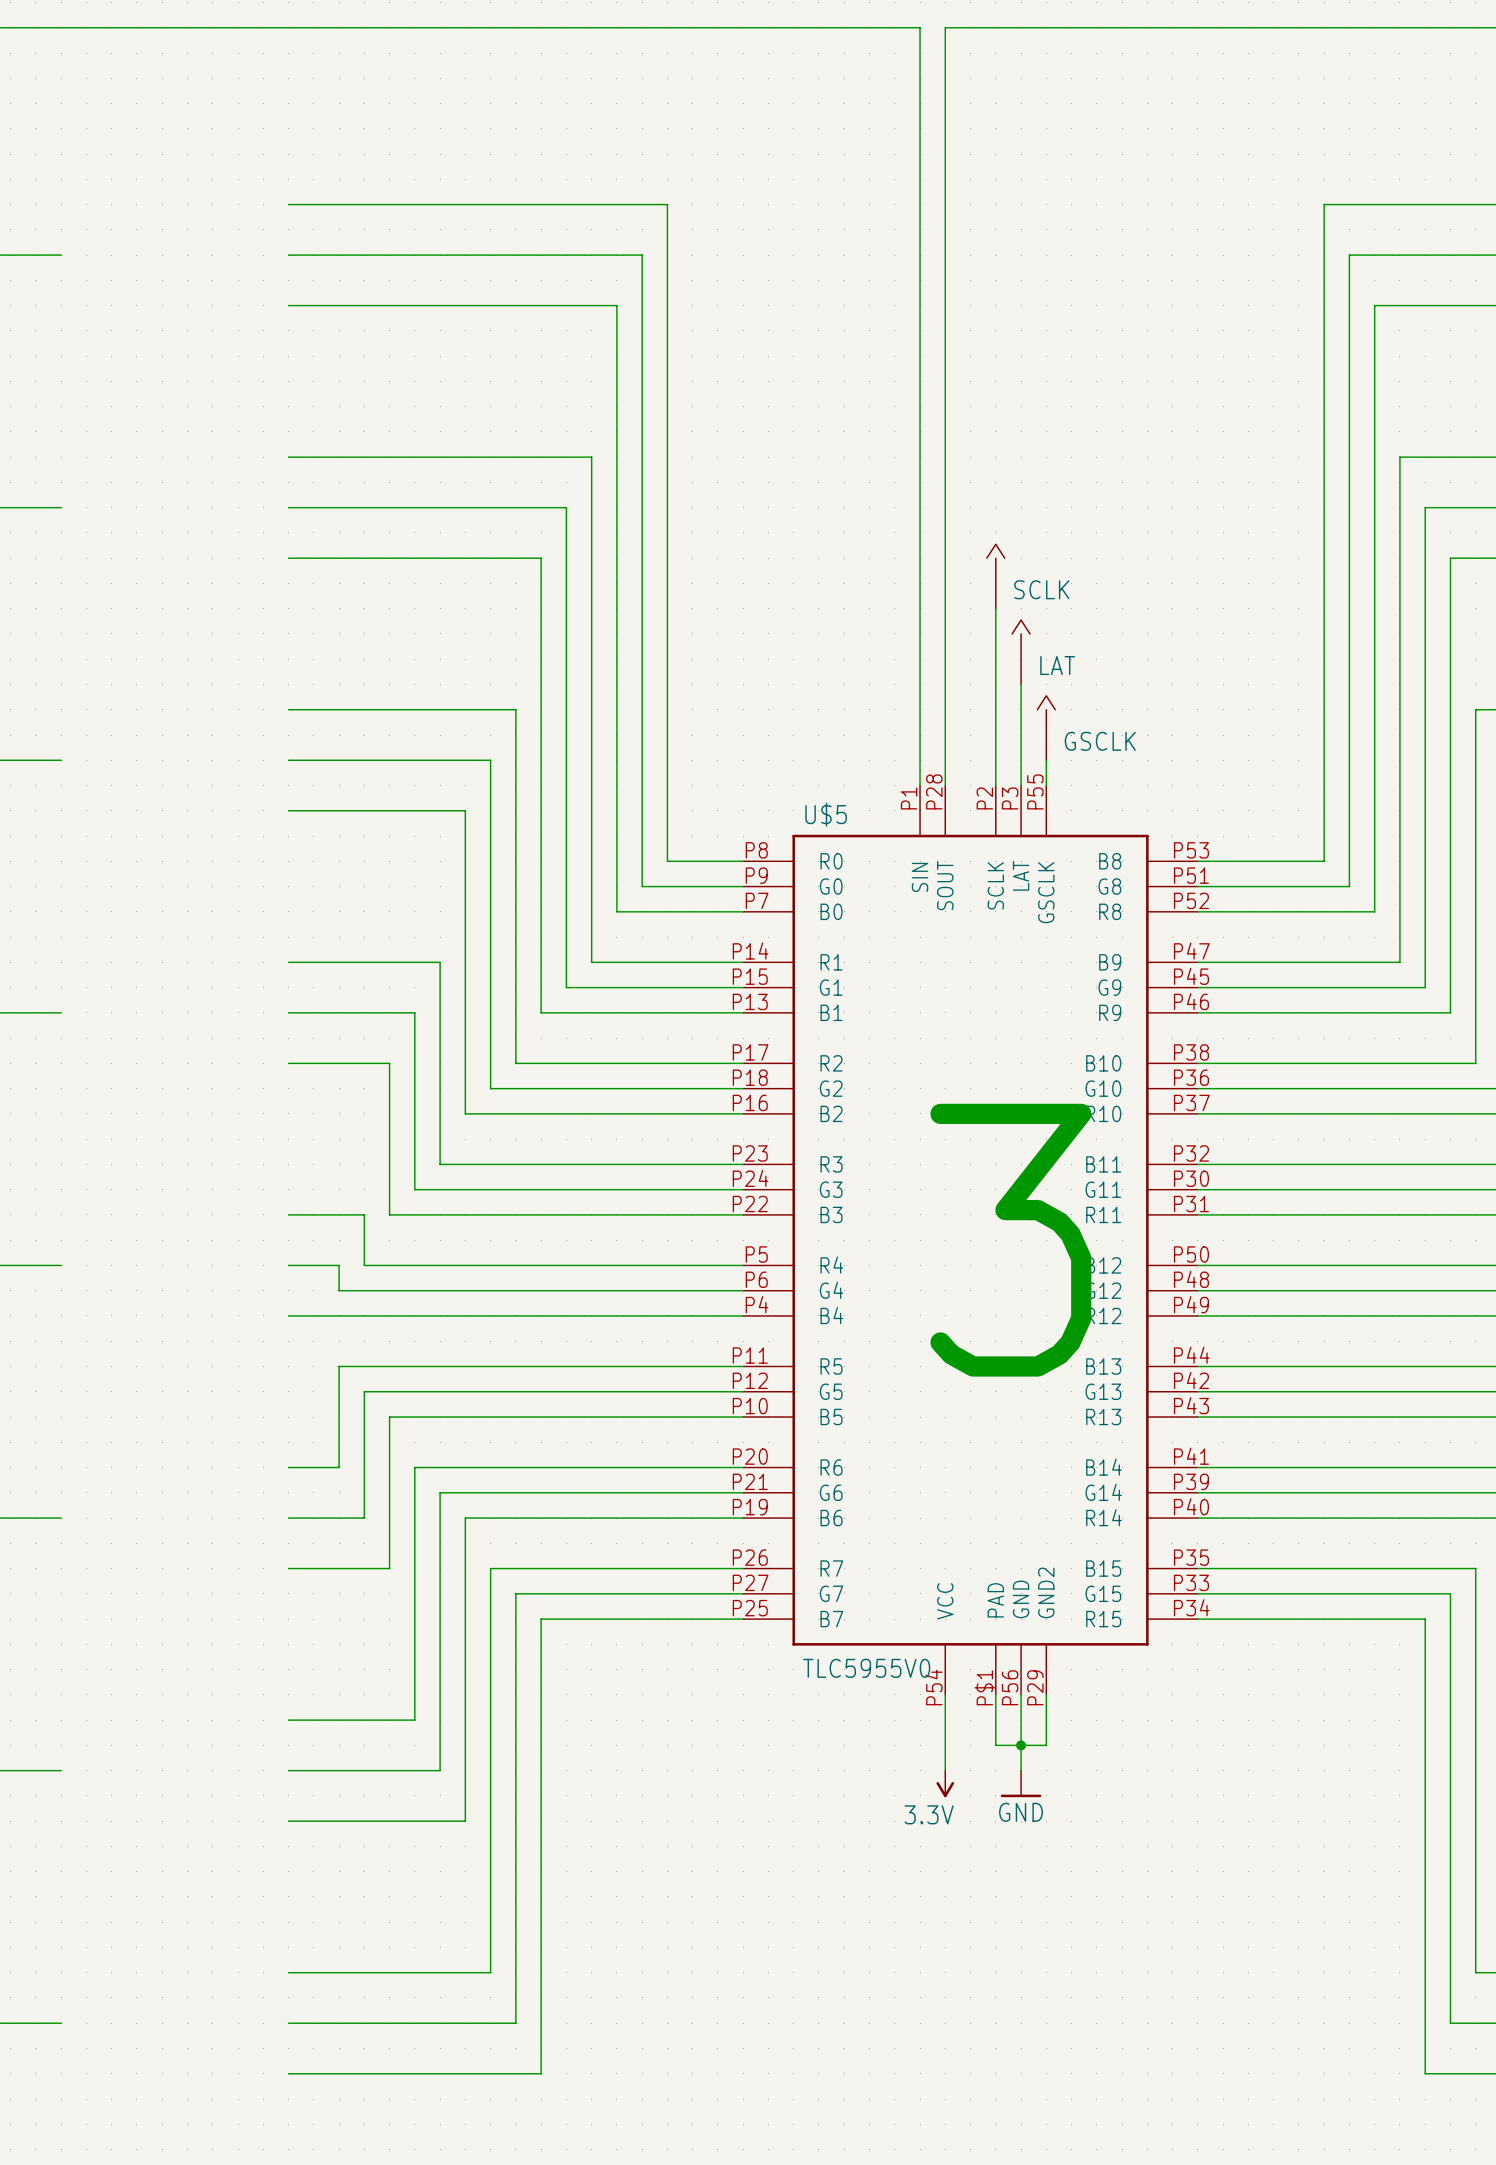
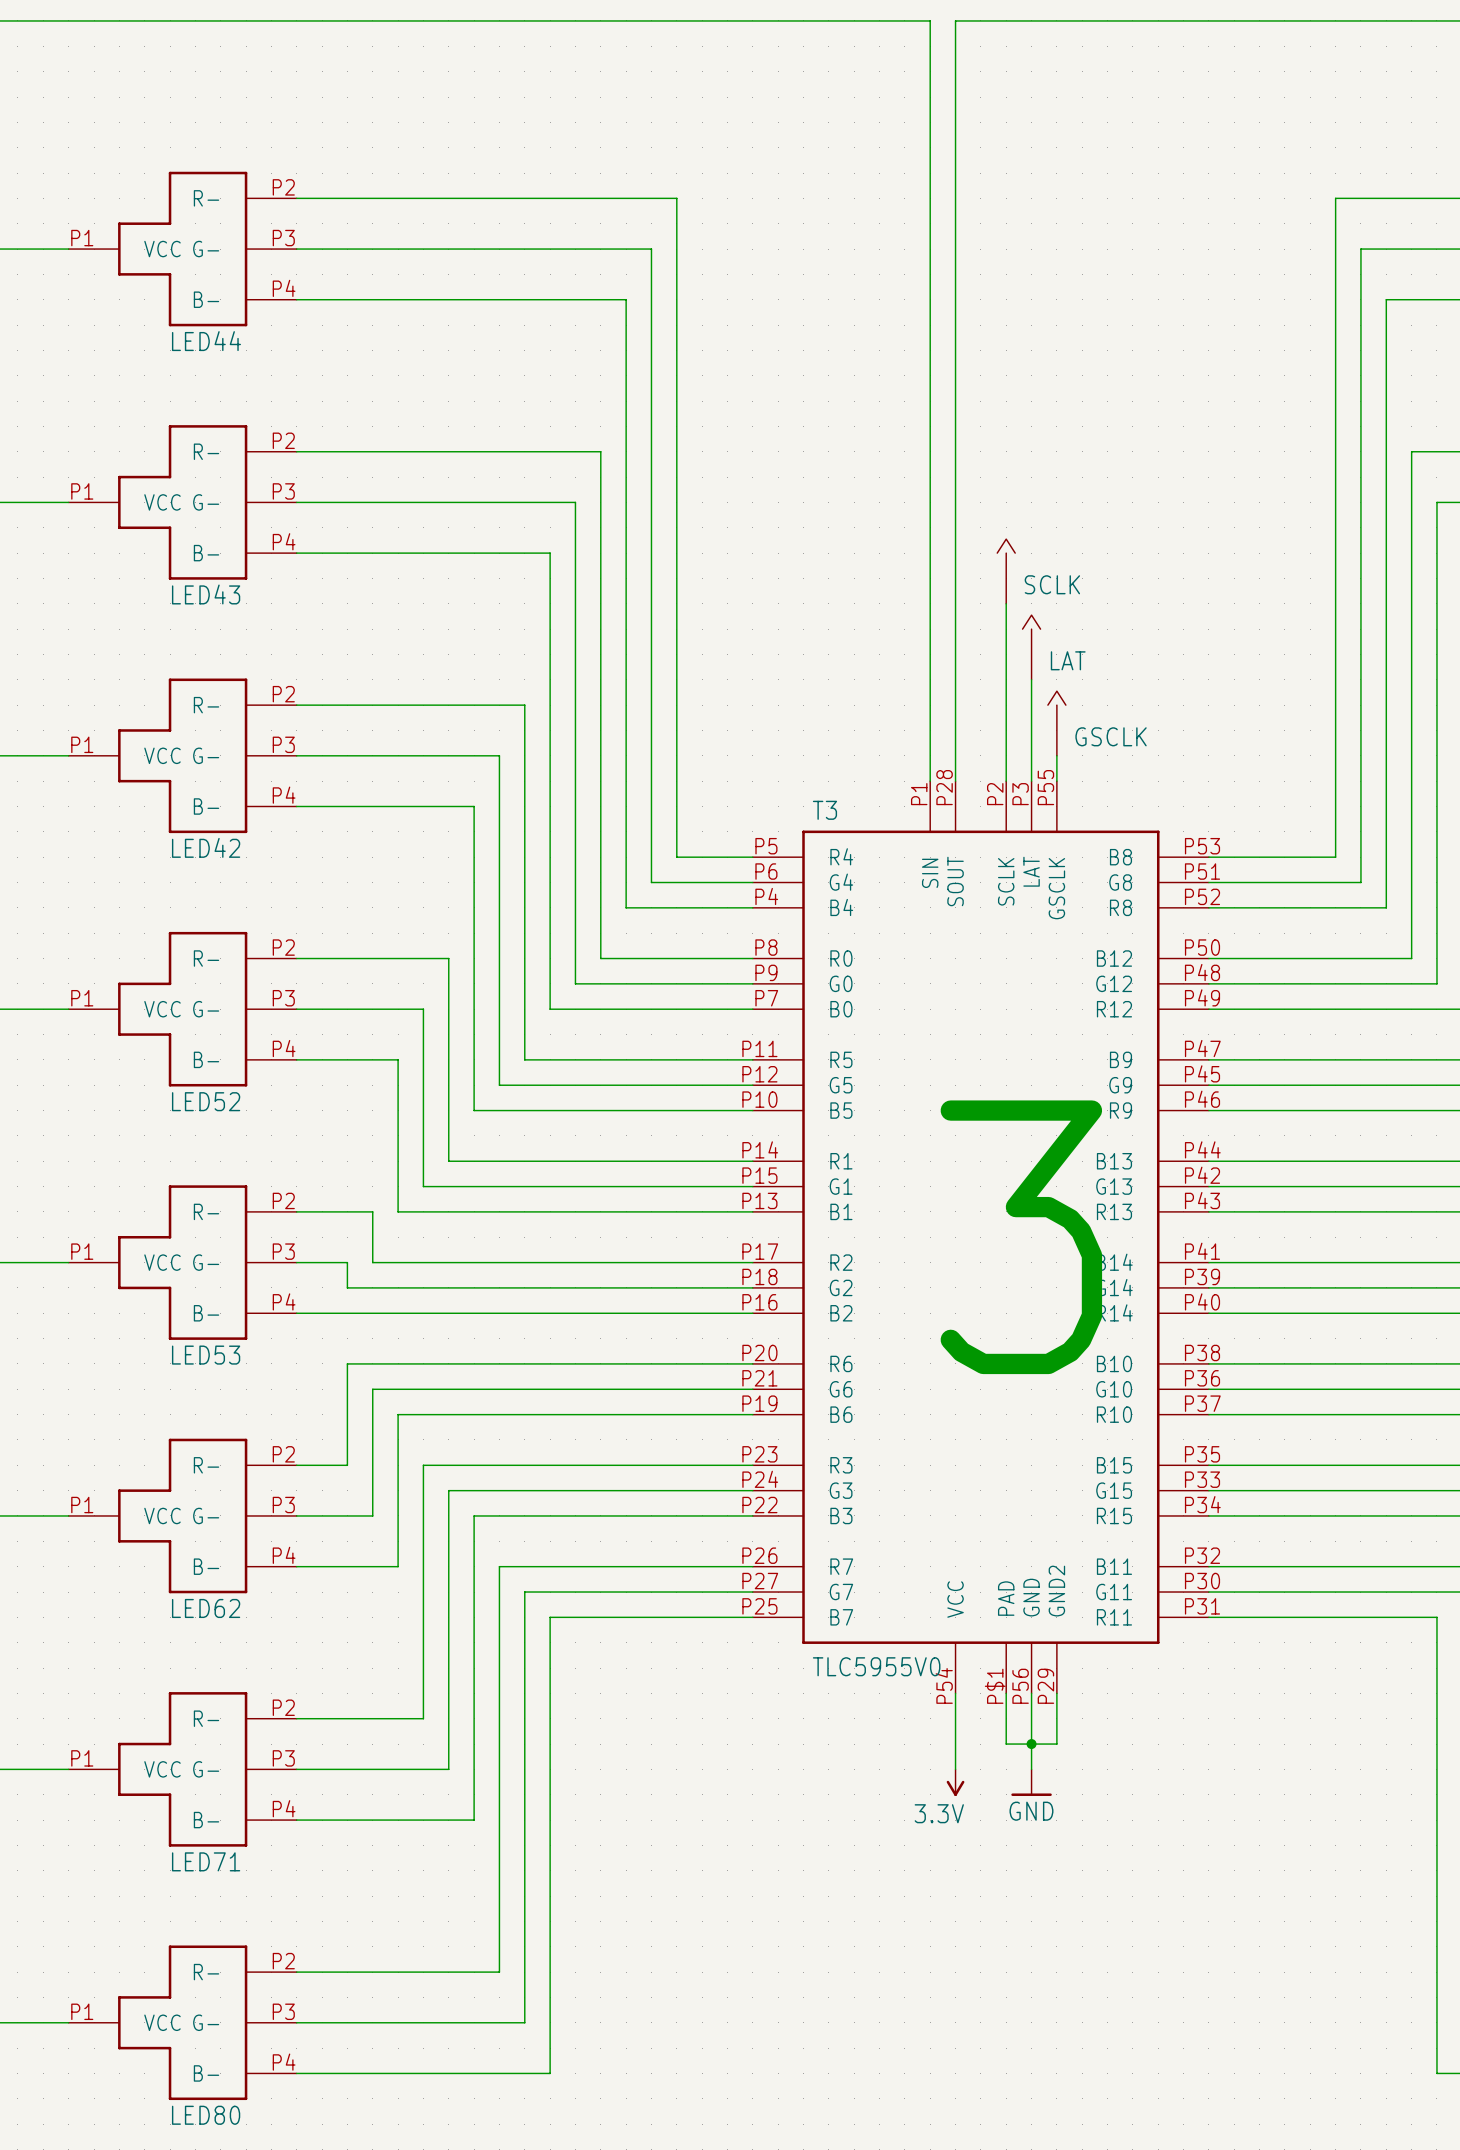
LED44: none -> (182, 249)
LED43: none -> (182, 502)
LED42: none -> (182, 755)
U$5 symbol: [743, 785, 1198, 1695] -> [752, 781, 1209, 1694]
U$5 name: U$5 (826, 814) -> T3 (824, 810)
LED52: none -> (182, 1009)
LED53: none -> (182, 1262)
LED62: none -> (182, 1515)
LED71: none -> (182, 1769)
LED80: none -> (182, 2022)

